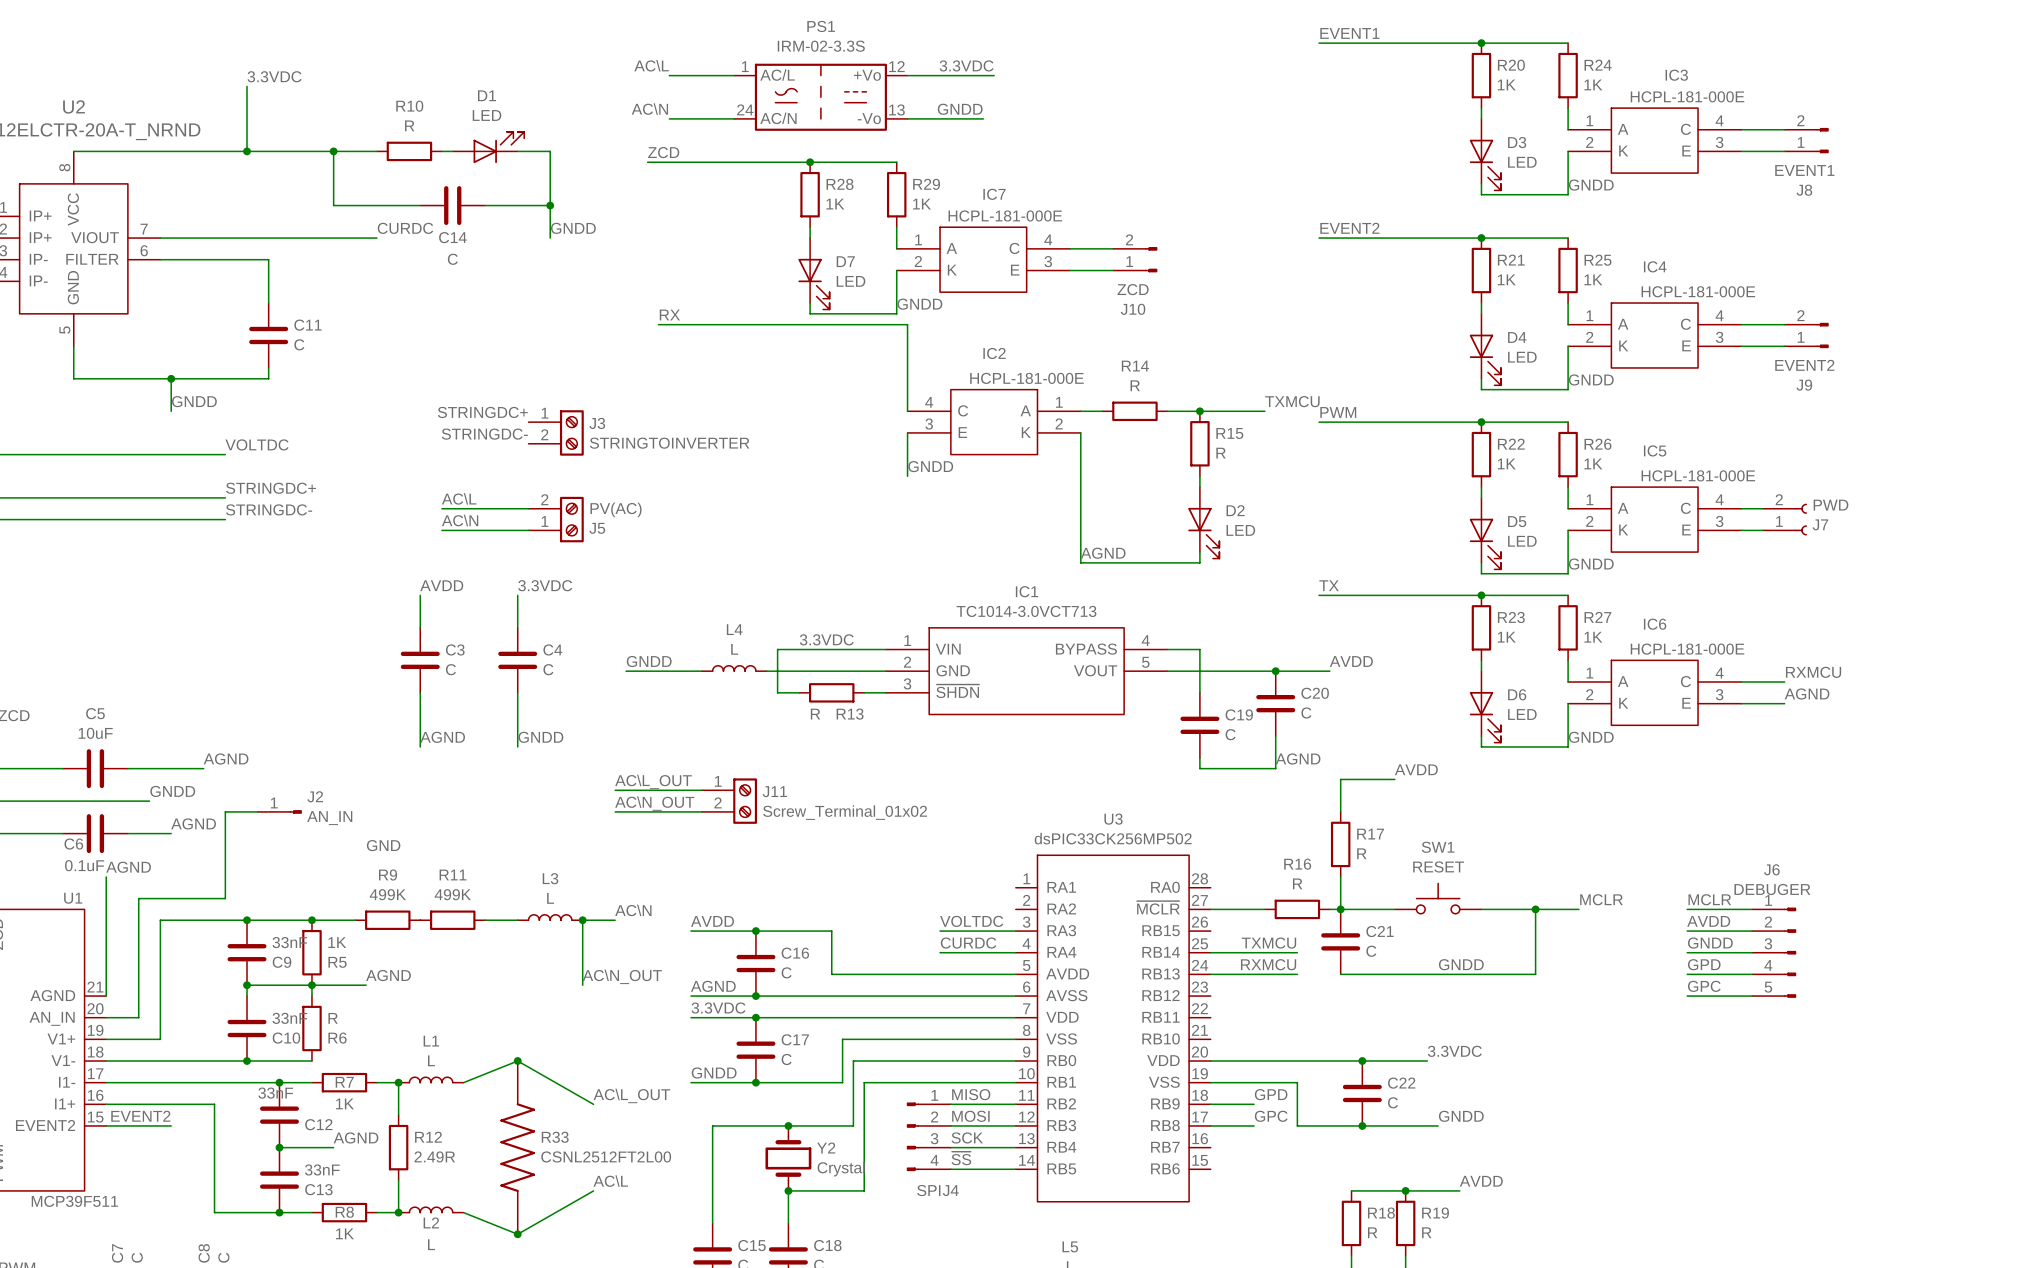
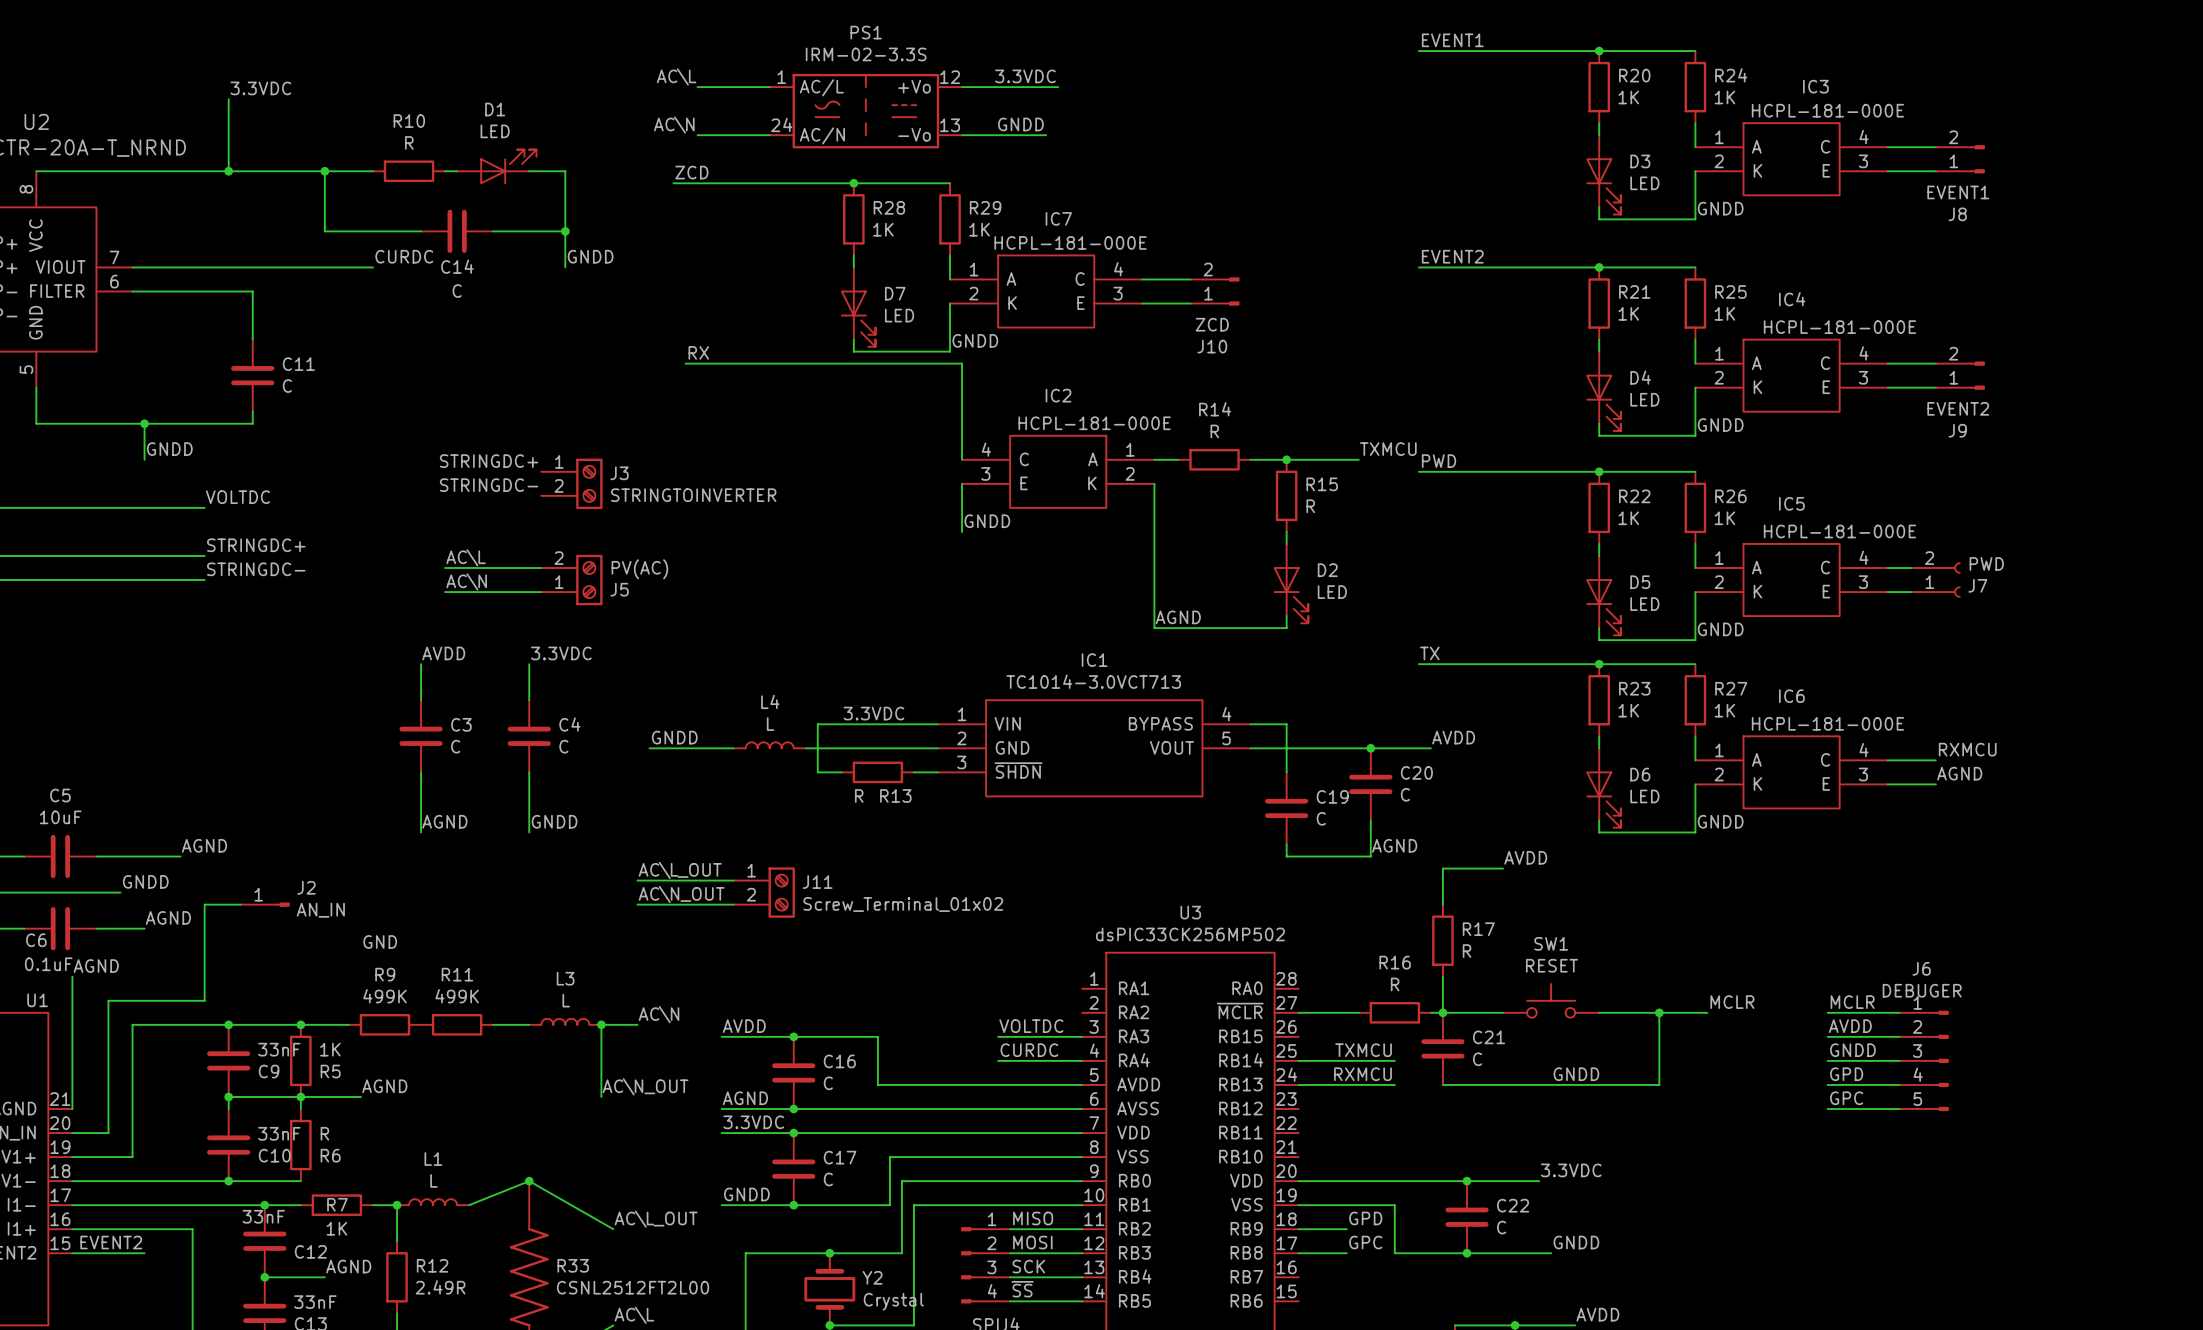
label: PWM (1338, 412) -> PWD (1439, 461)

